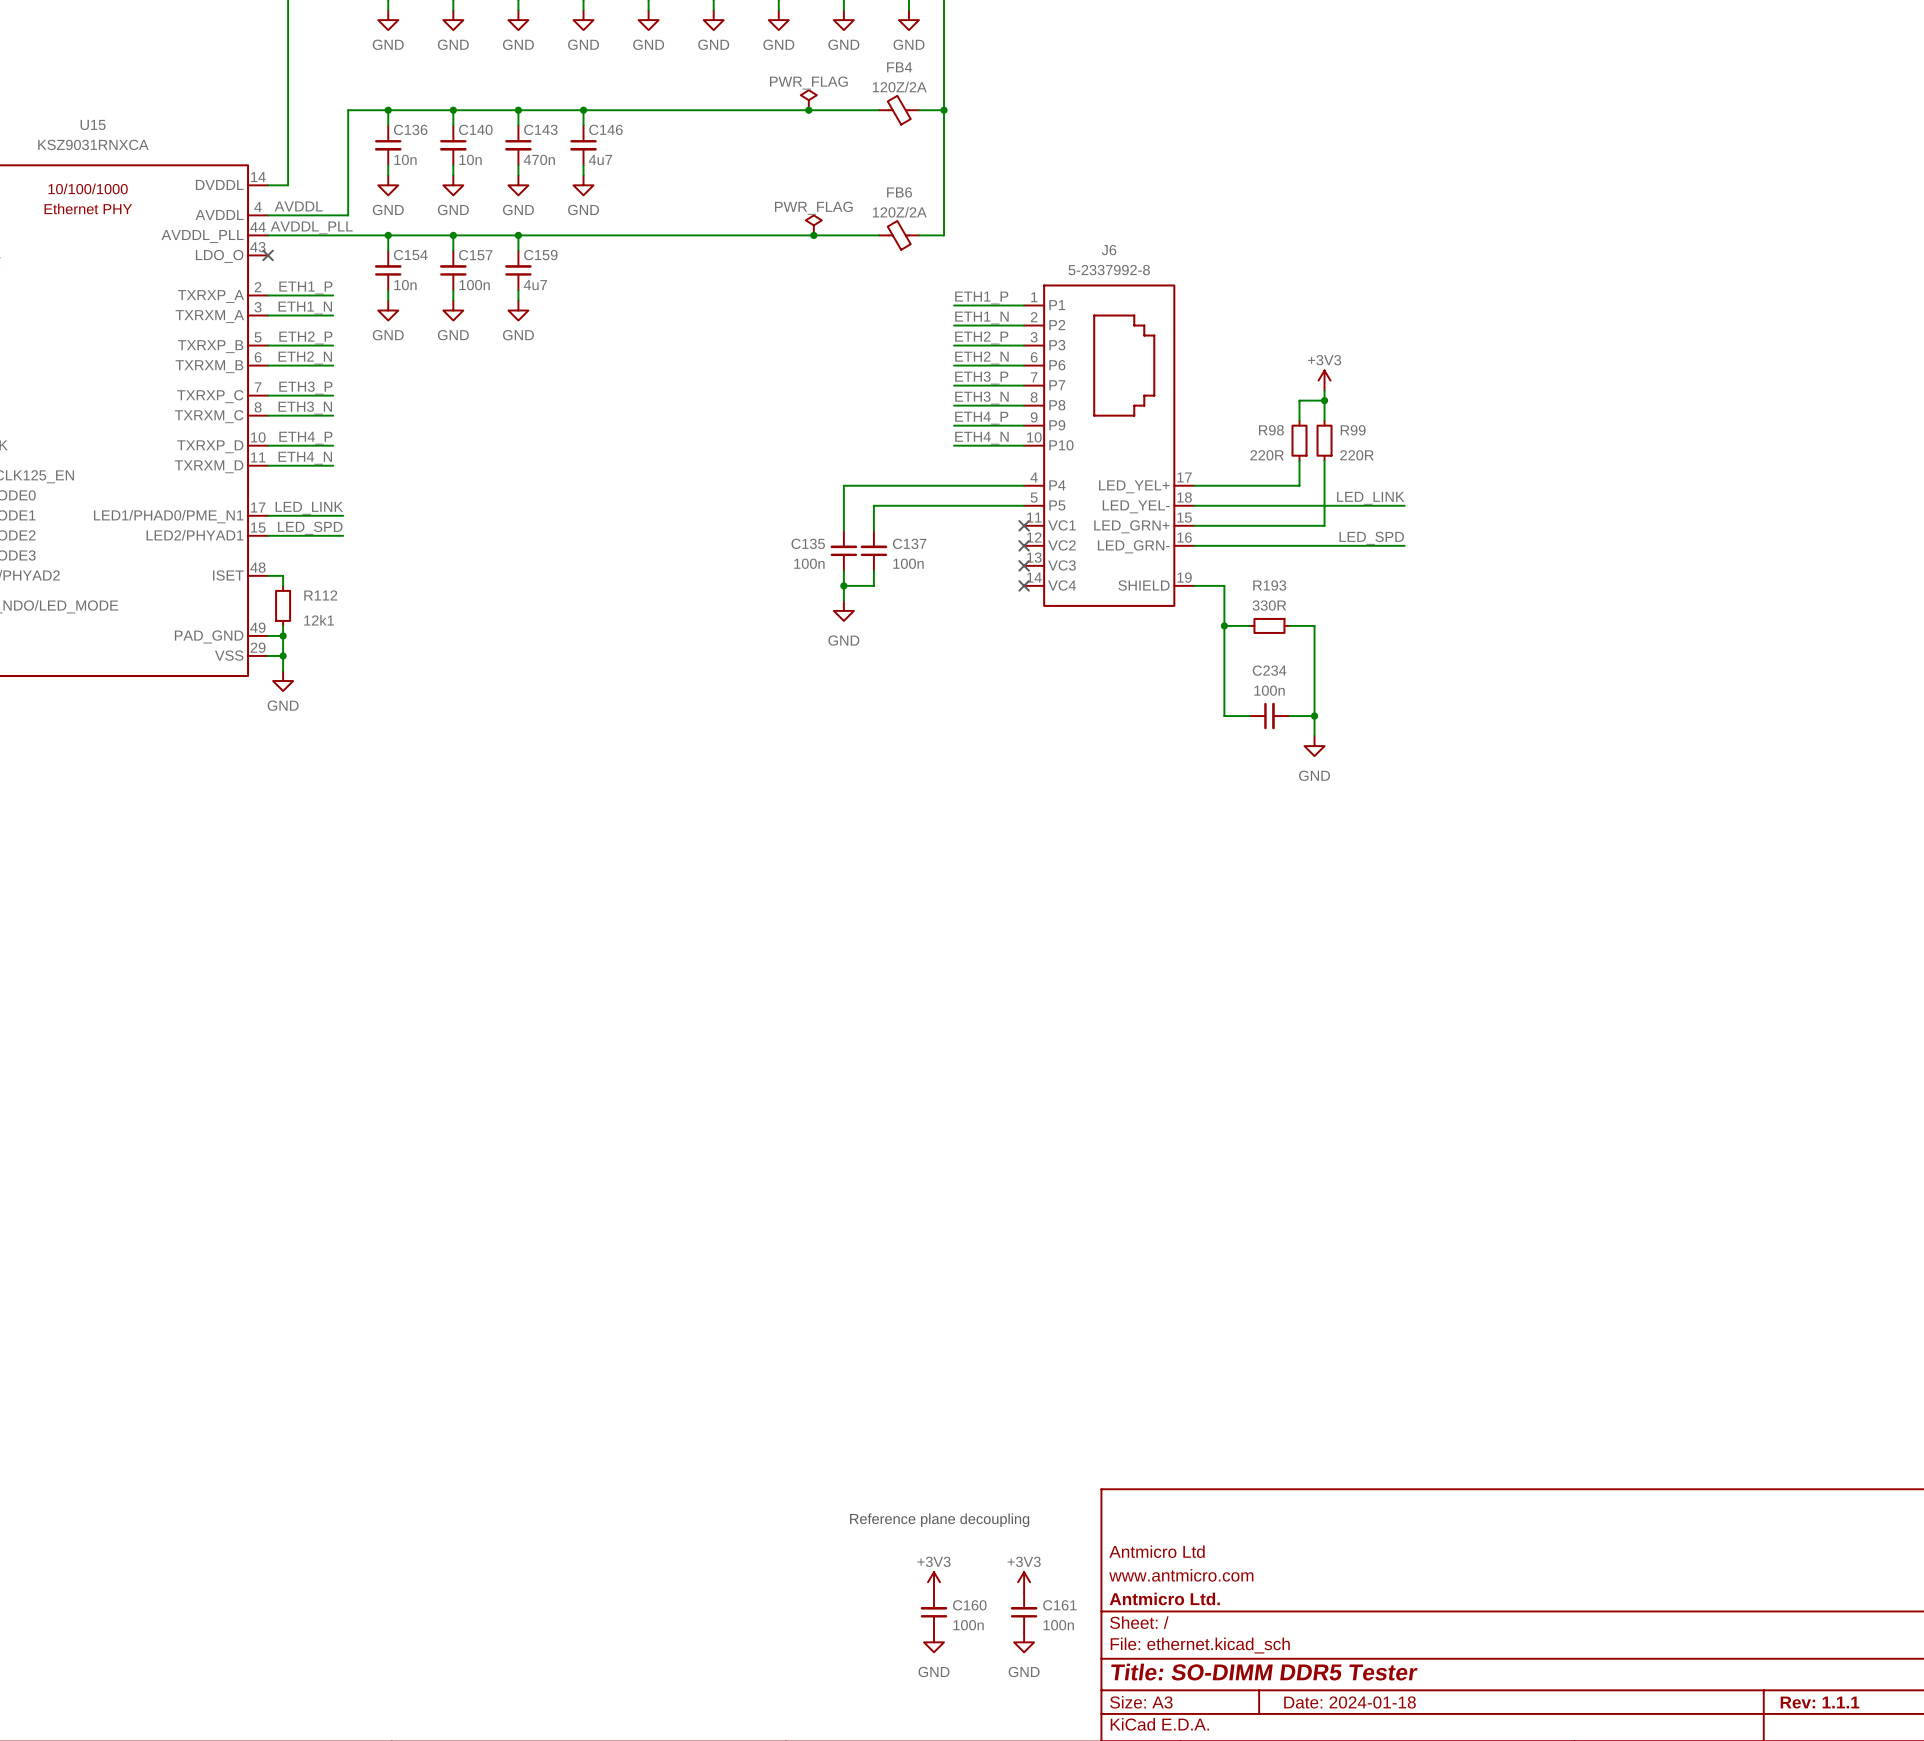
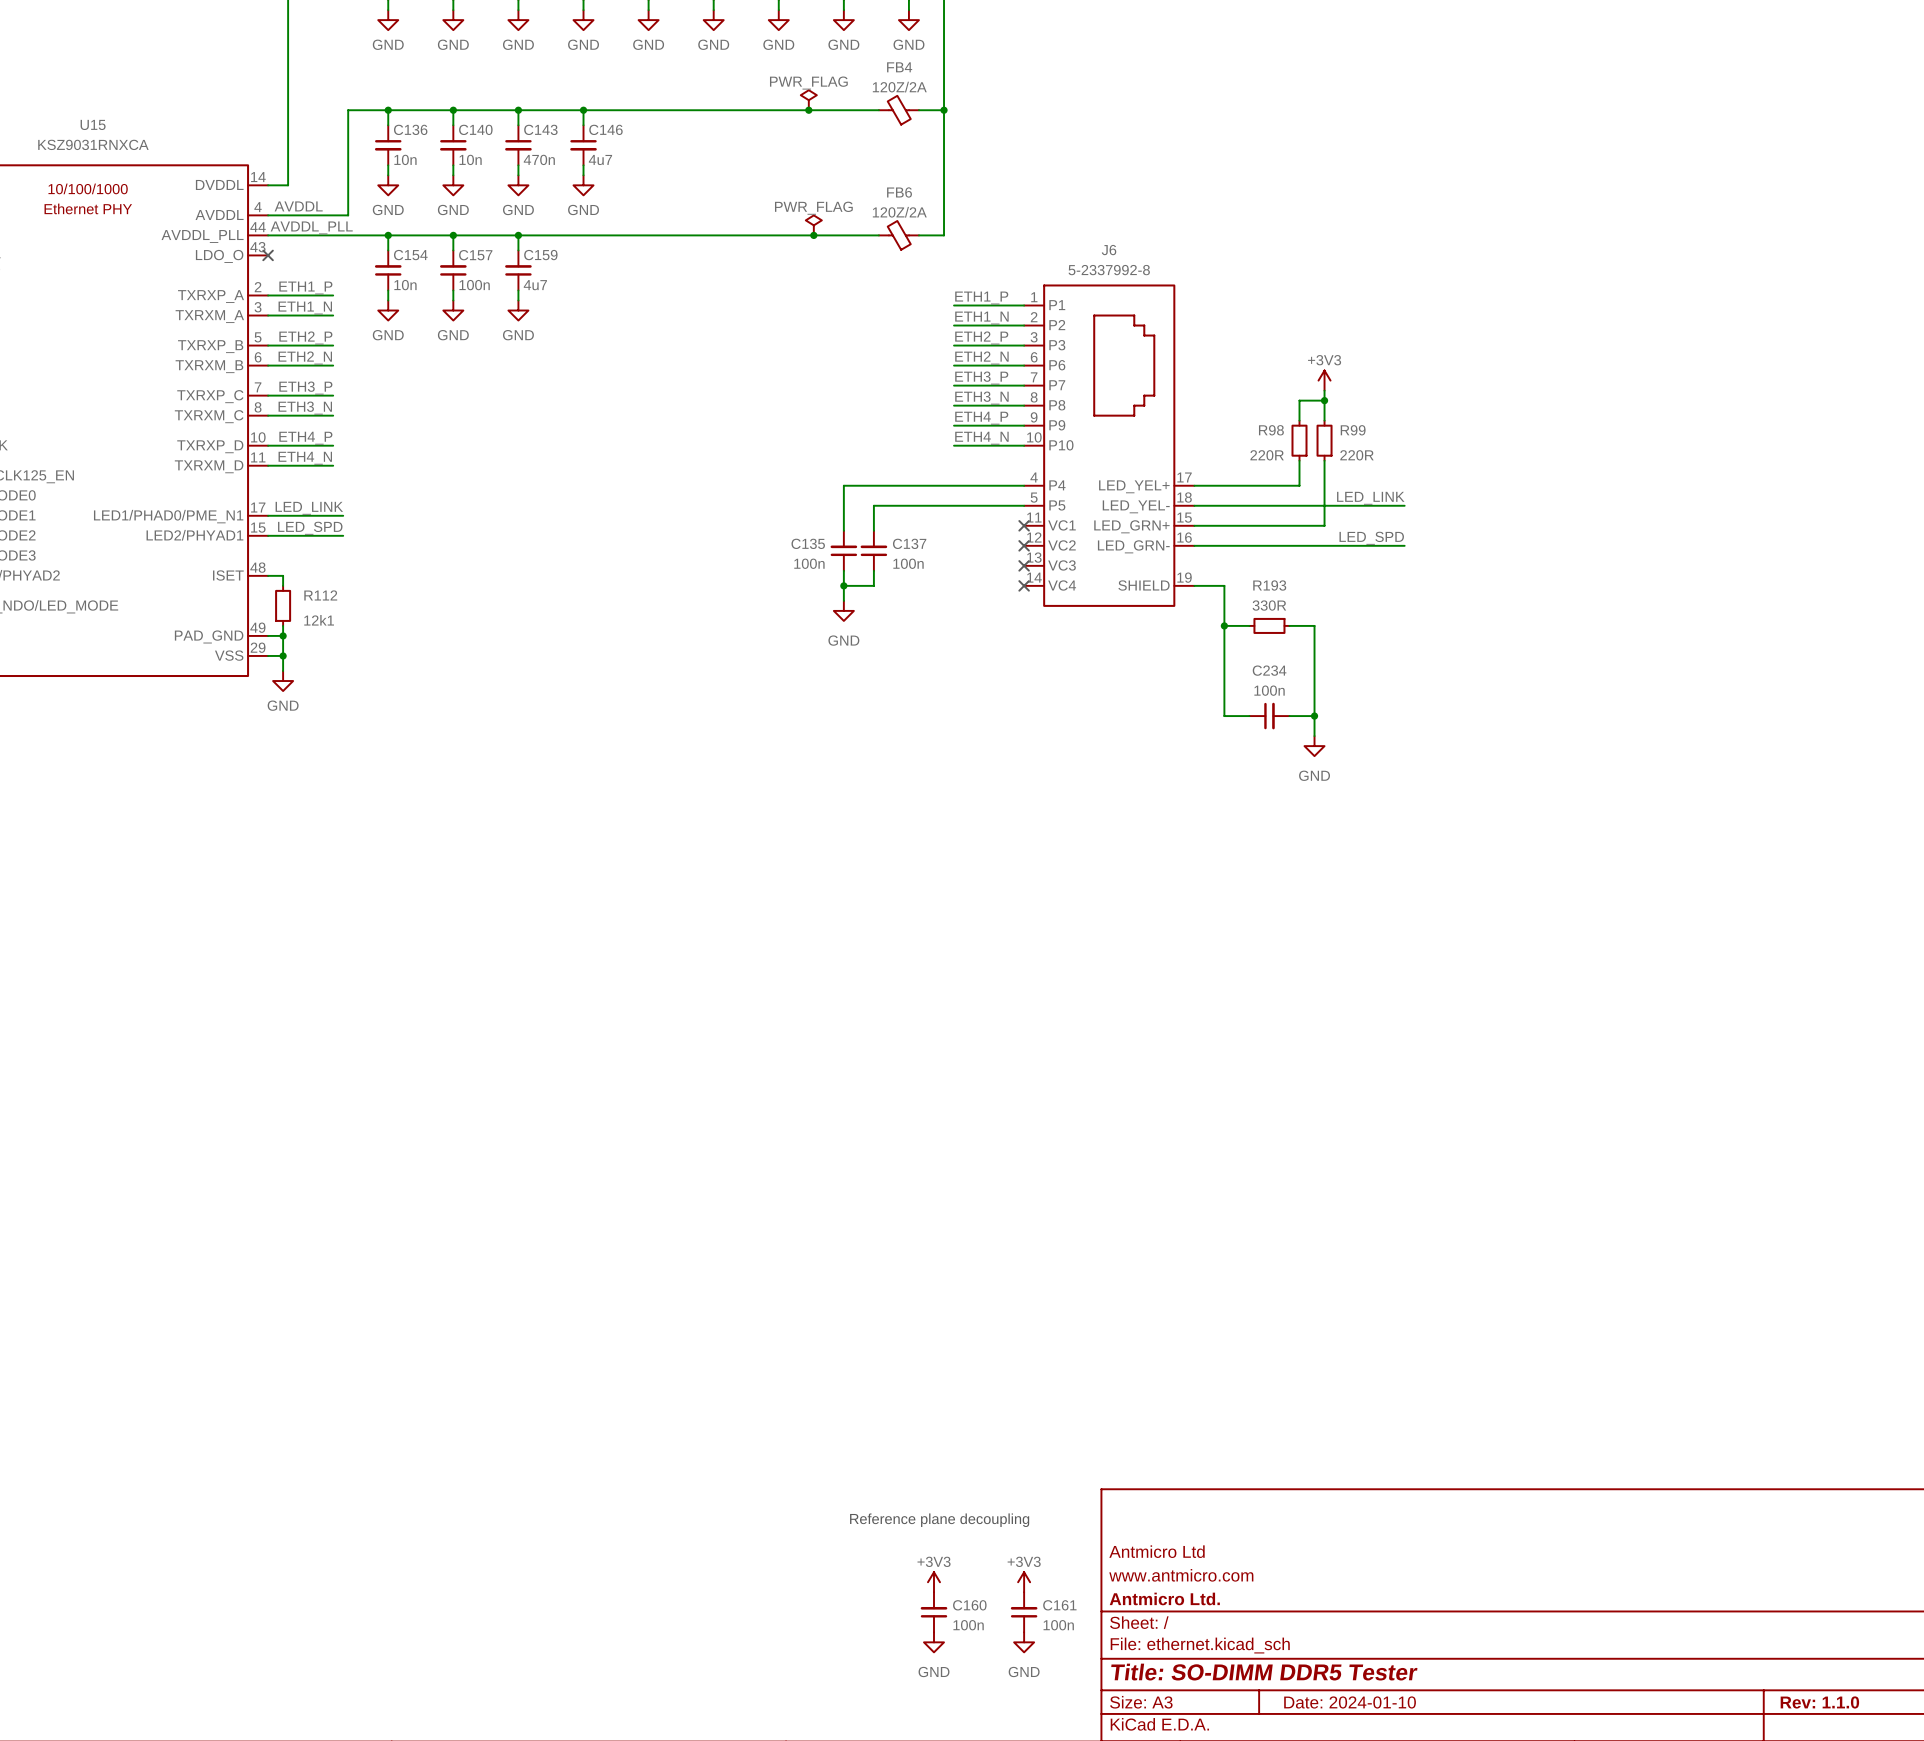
title block: Date: 2024-01-18 (1350, 1702) -> Date: 2024-01-10 (1350, 1702)
title block: Rev: 1.1.1 (1820, 1702) -> Rev: 1.1.0 (1819, 1702)

